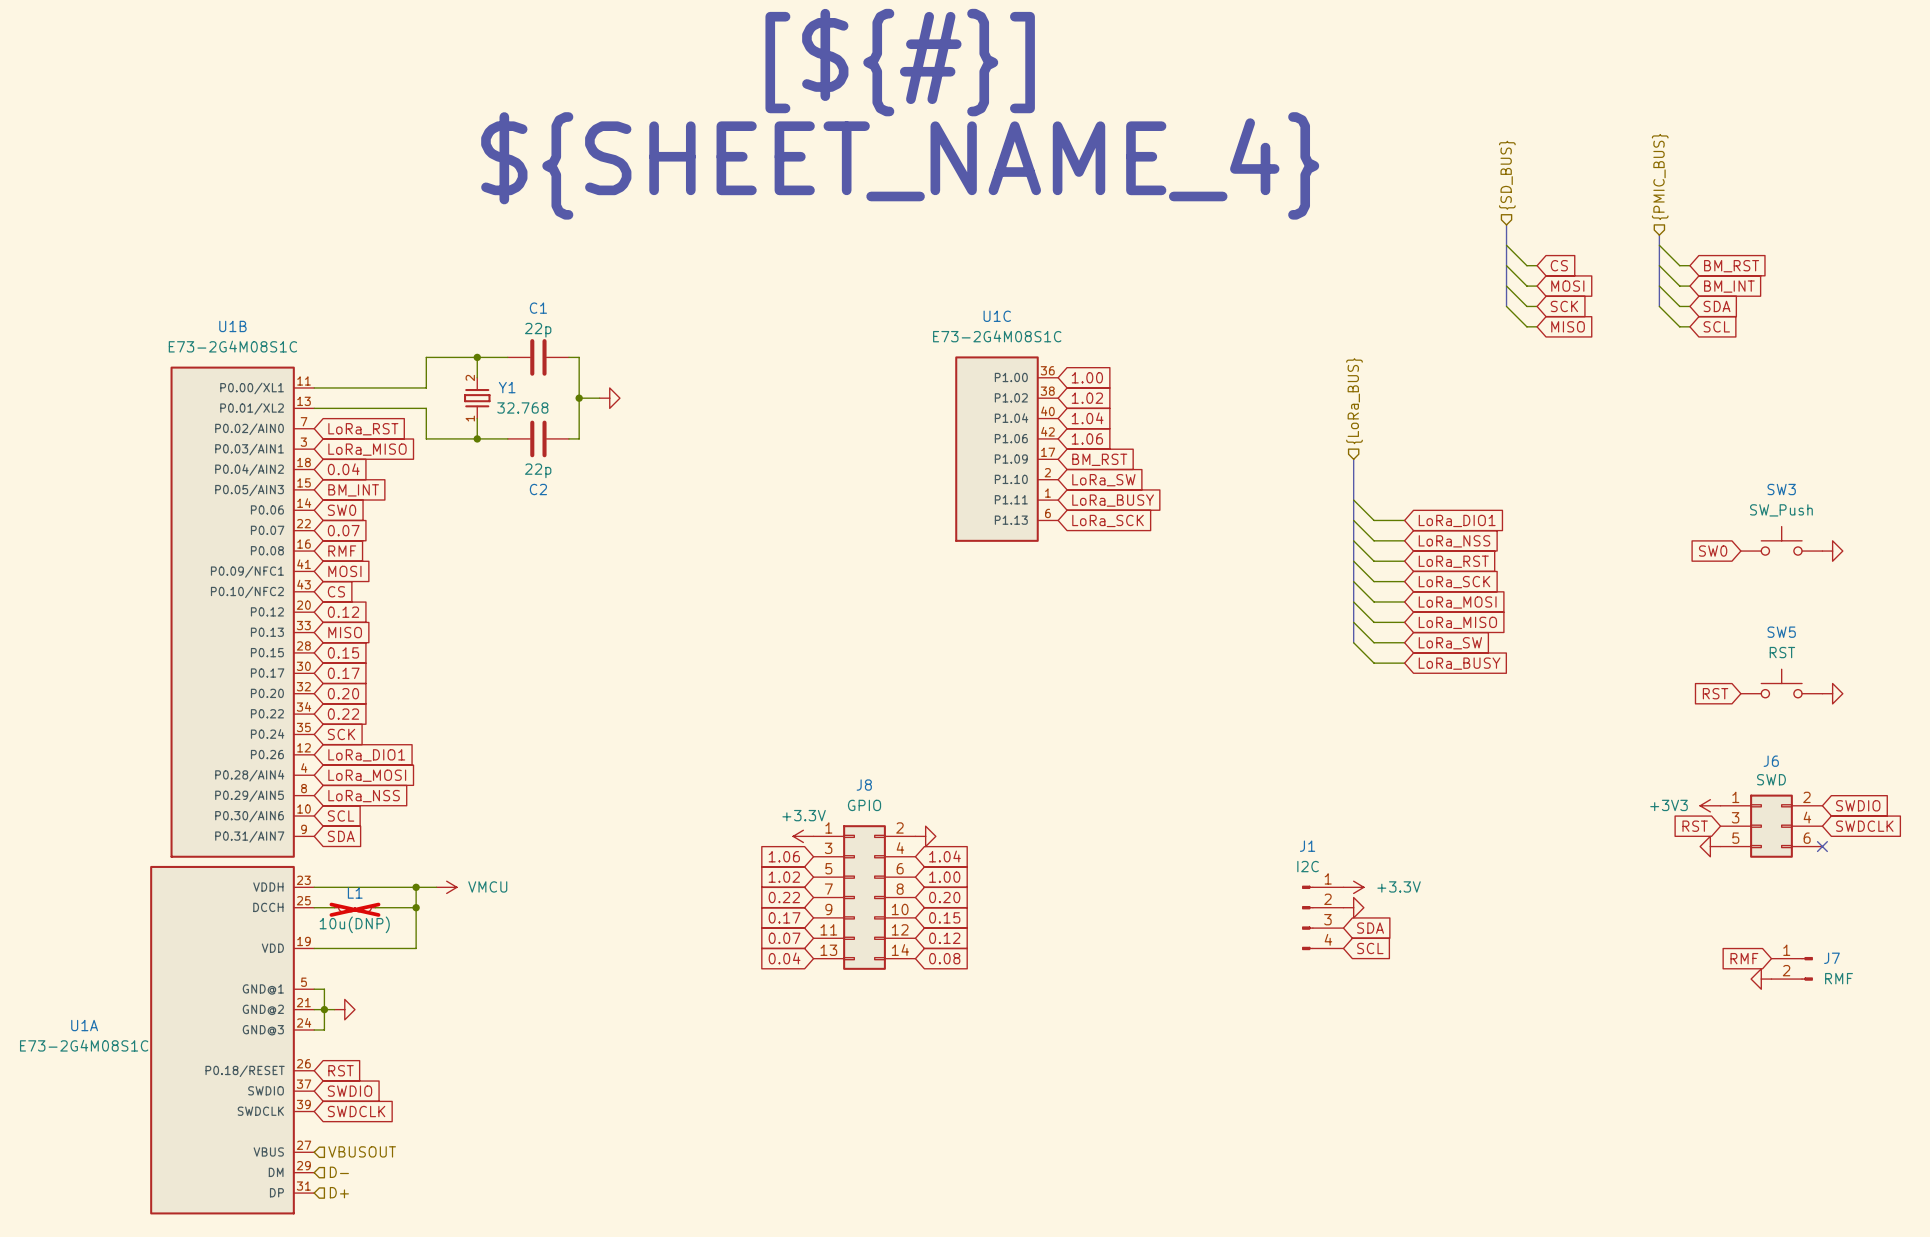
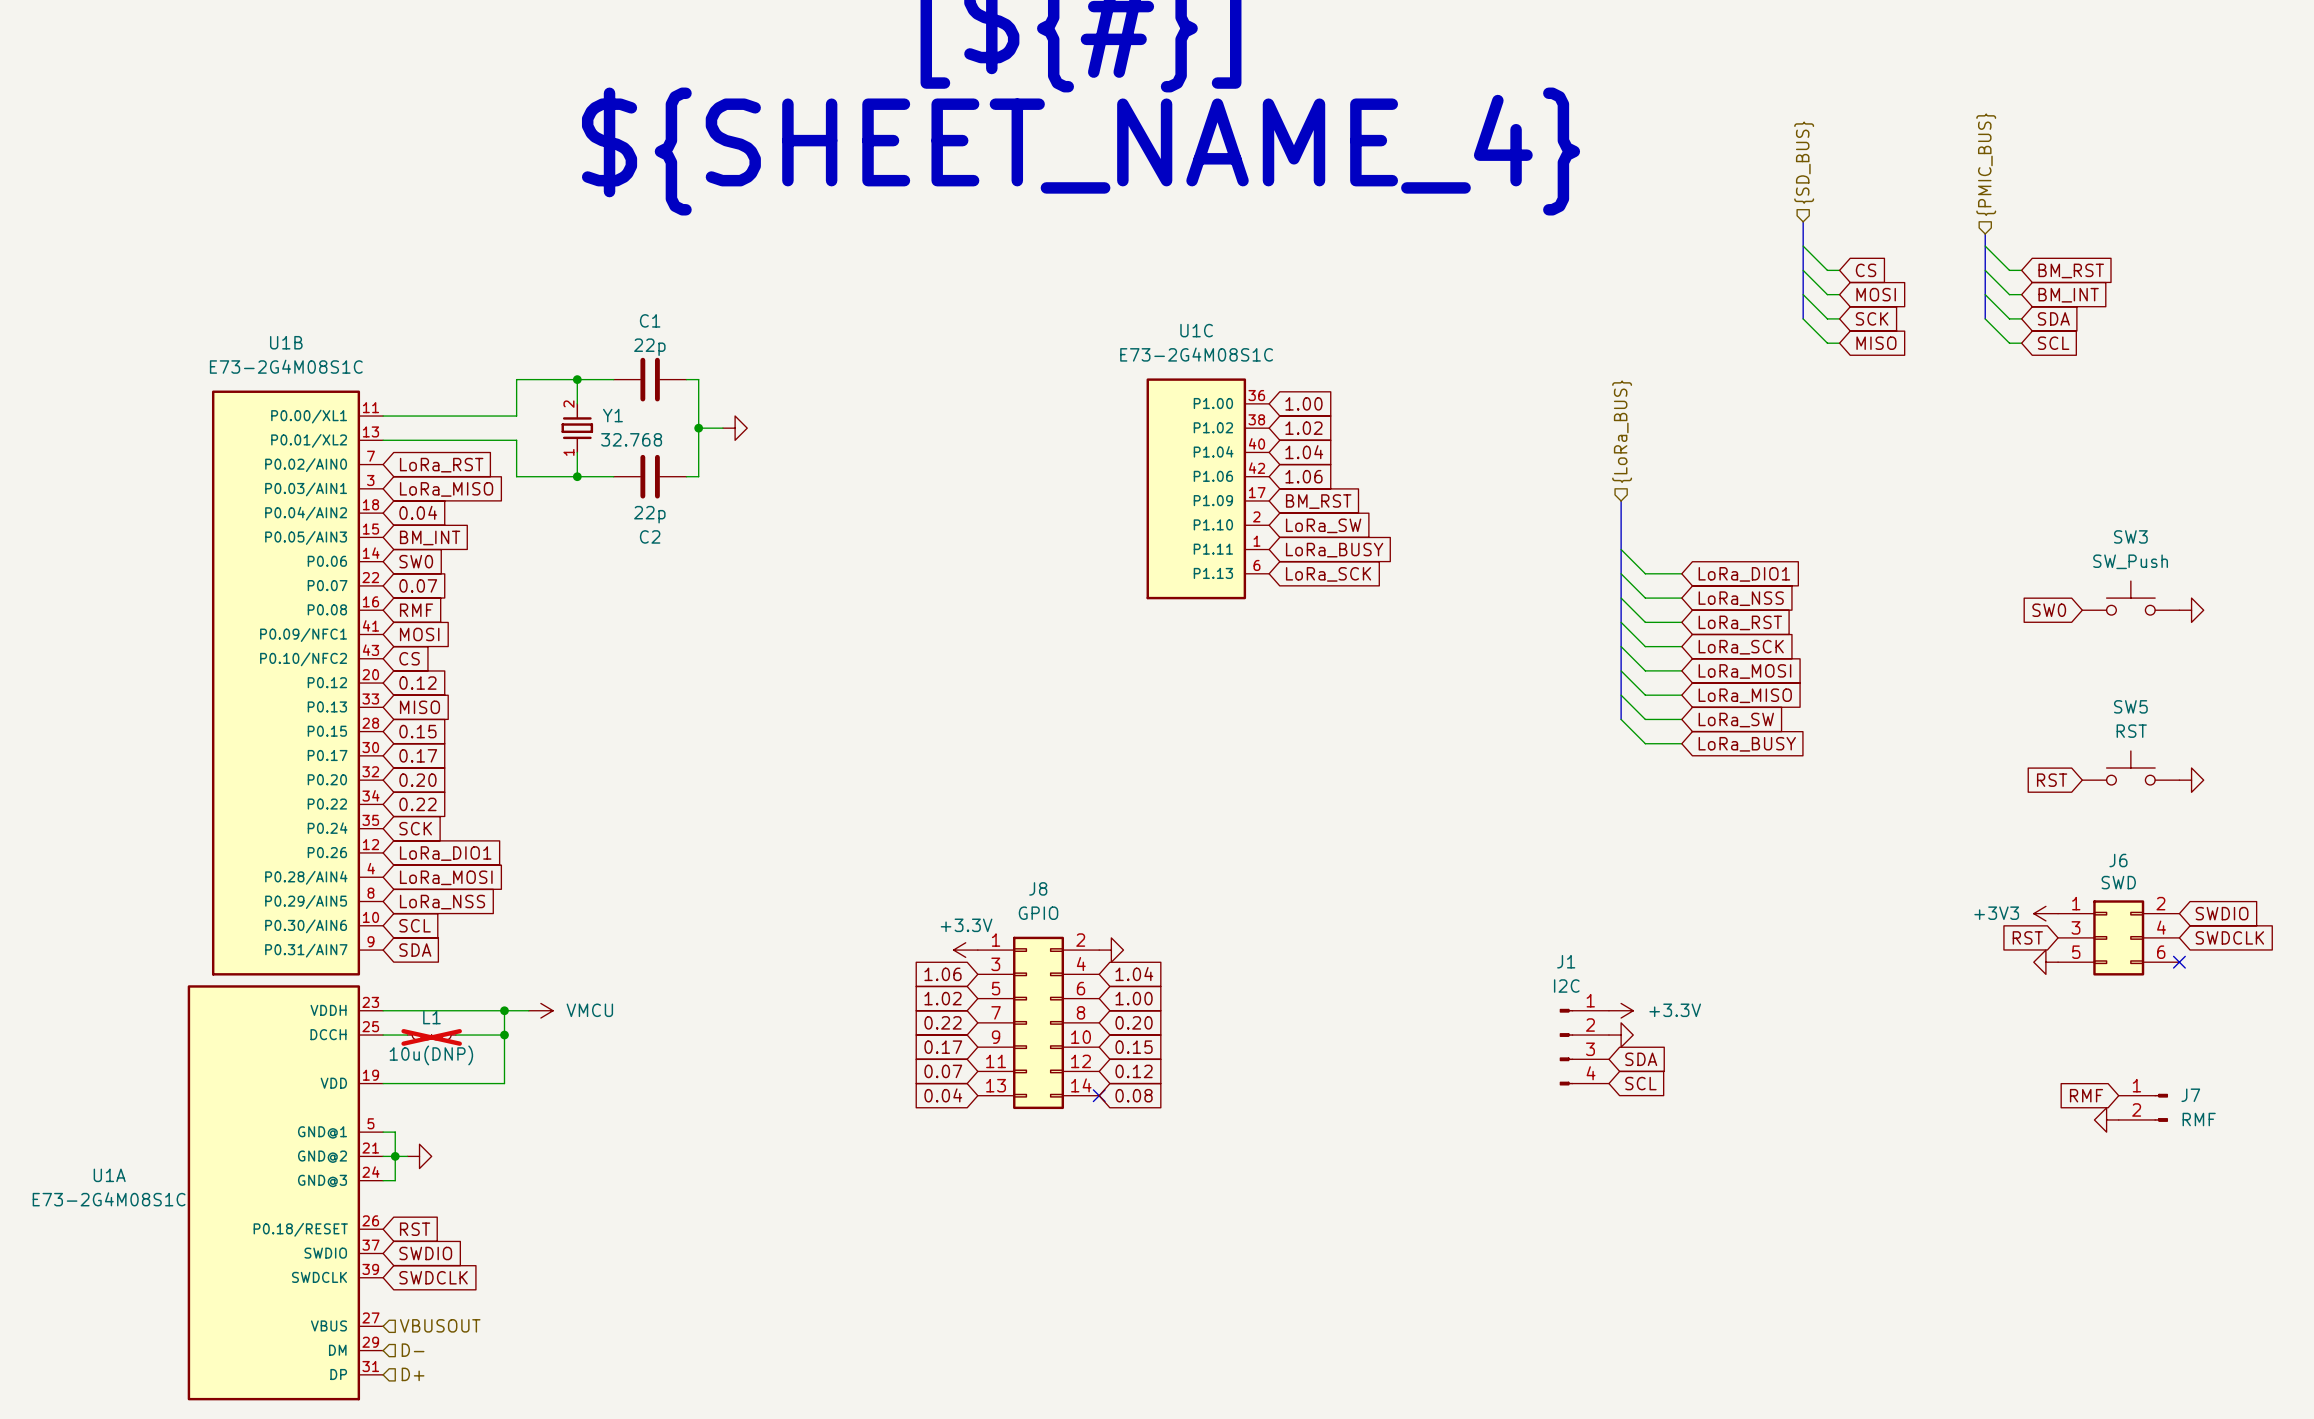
no-connect mark: none -> (1099, 1095)

